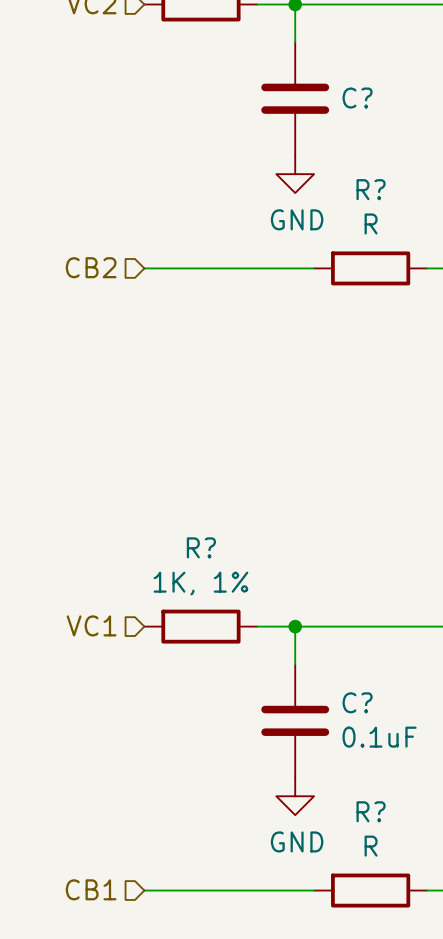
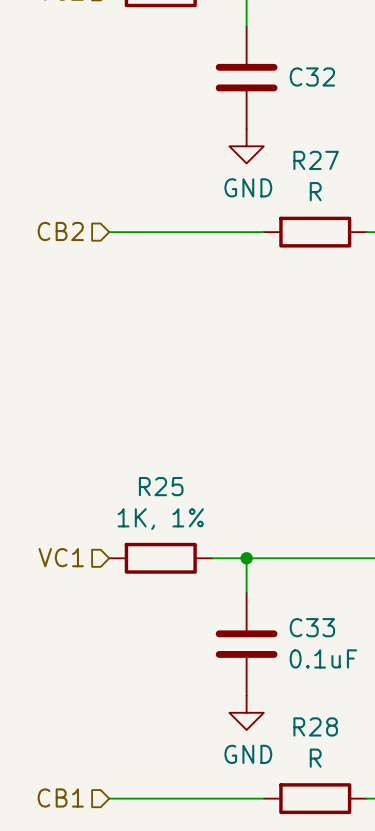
C? name: C? (357, 98) -> C32 (312, 76)
R? name: R? (371, 189) -> R27 (316, 160)
R? name: R? (201, 547) -> R25 (161, 486)
C? name: C? (357, 702) -> C33 (312, 627)
R? name: R? (371, 811) -> R28 (315, 726)

